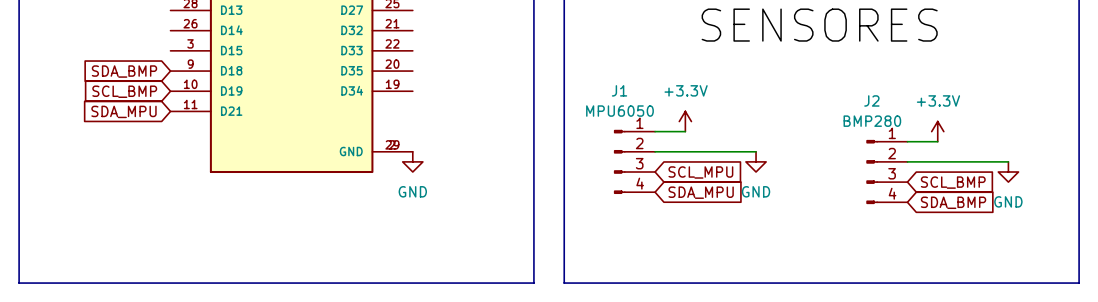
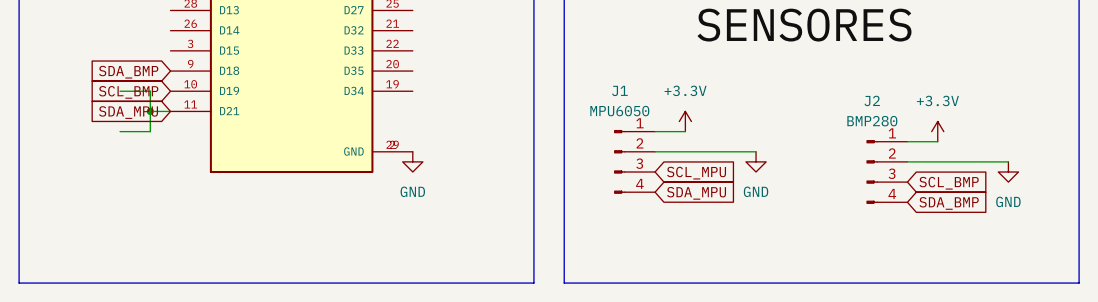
wire: none -> (120, 91) (150, 91) (150, 131) (120, 131)
wire: none -> (150, 111) (170, 111)
junction: none -> (150, 111)

